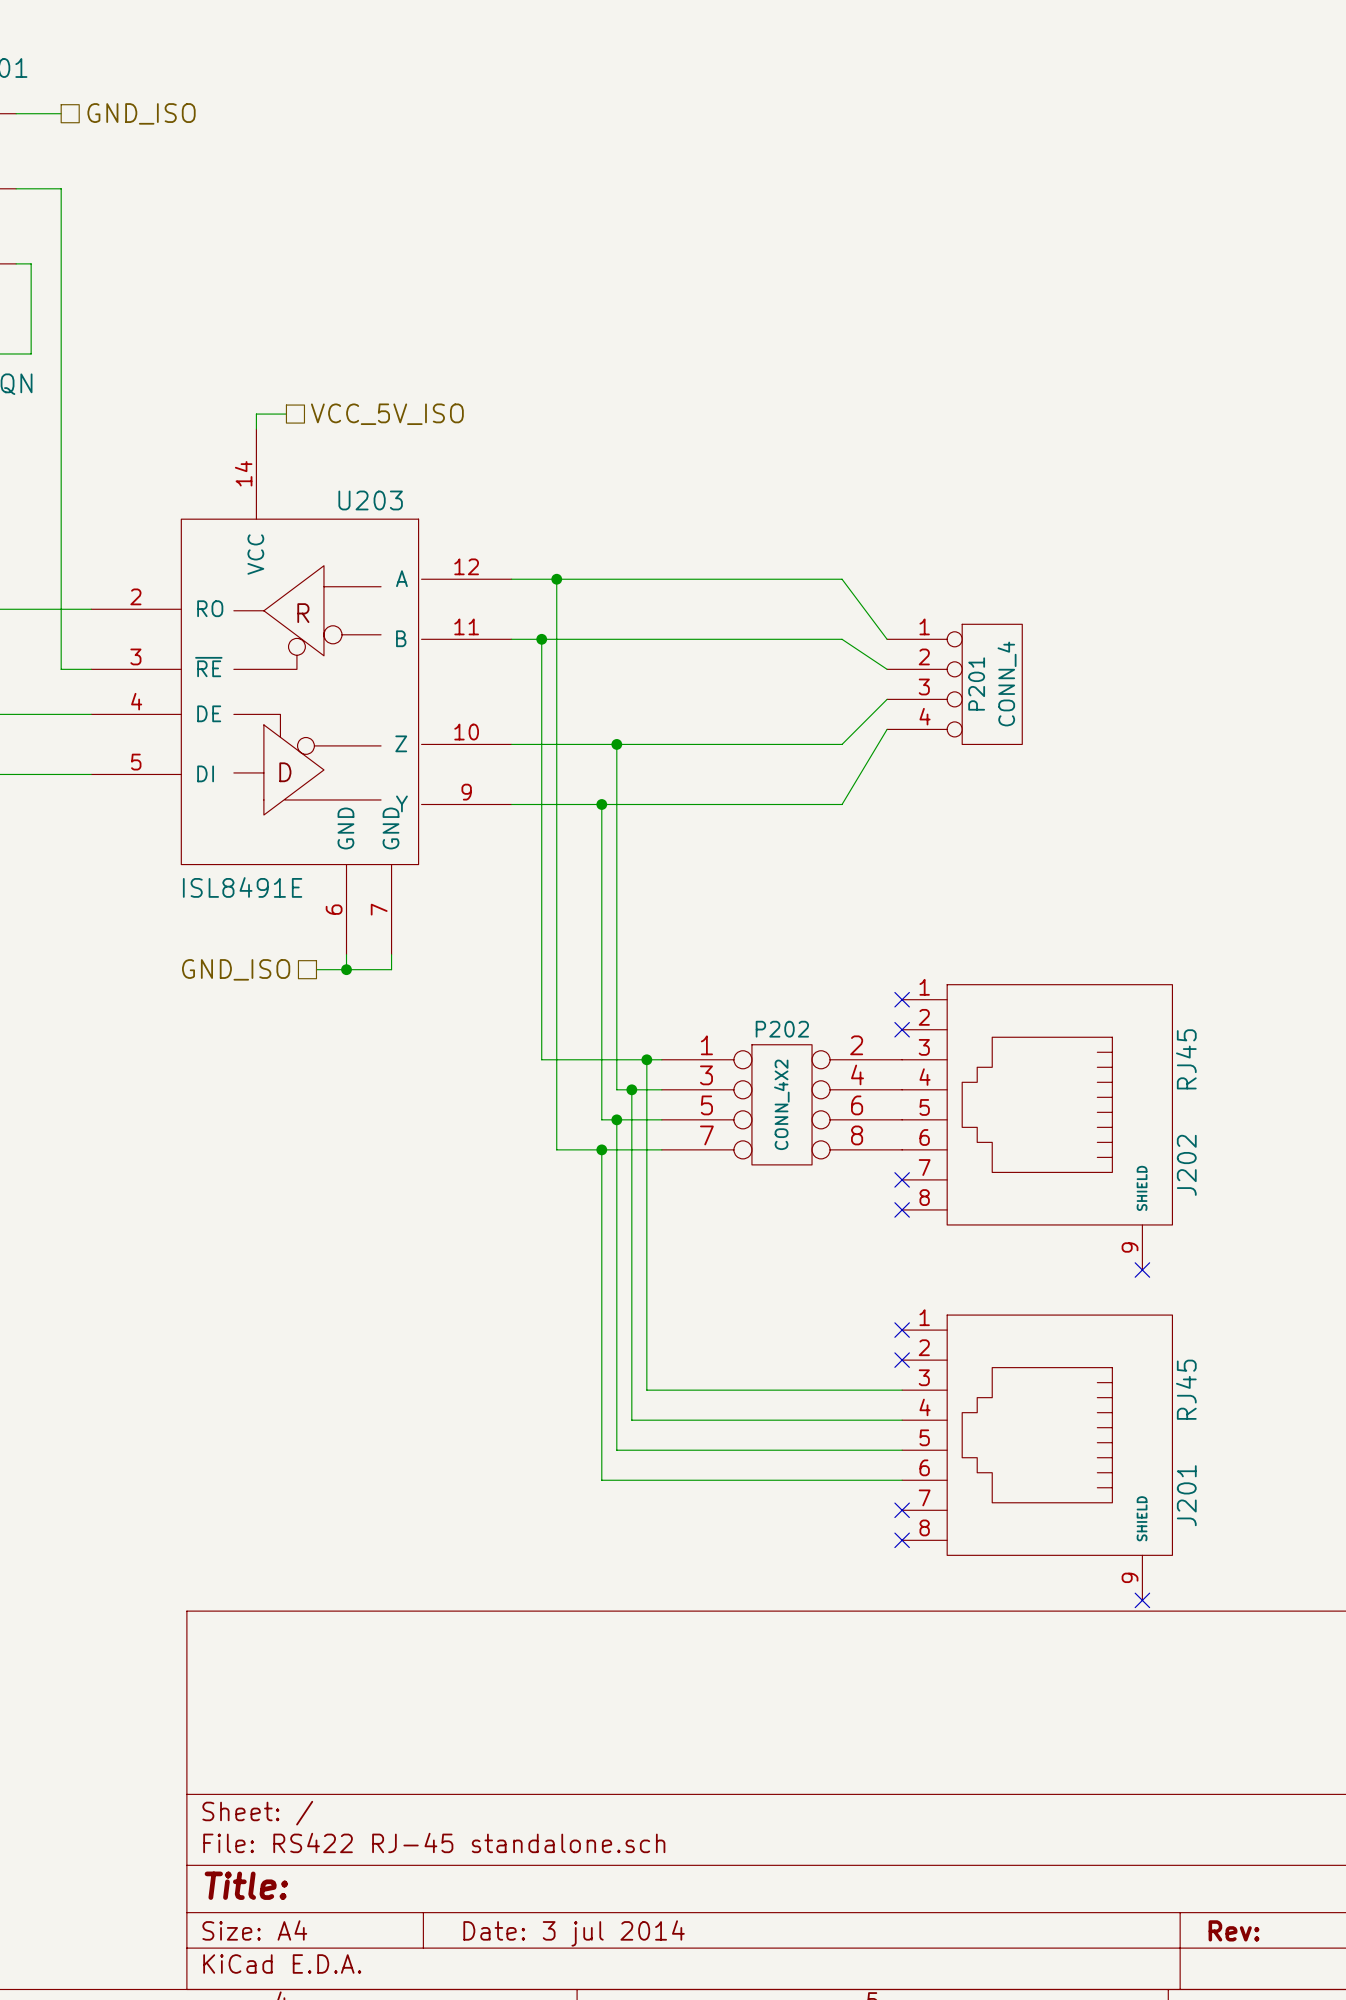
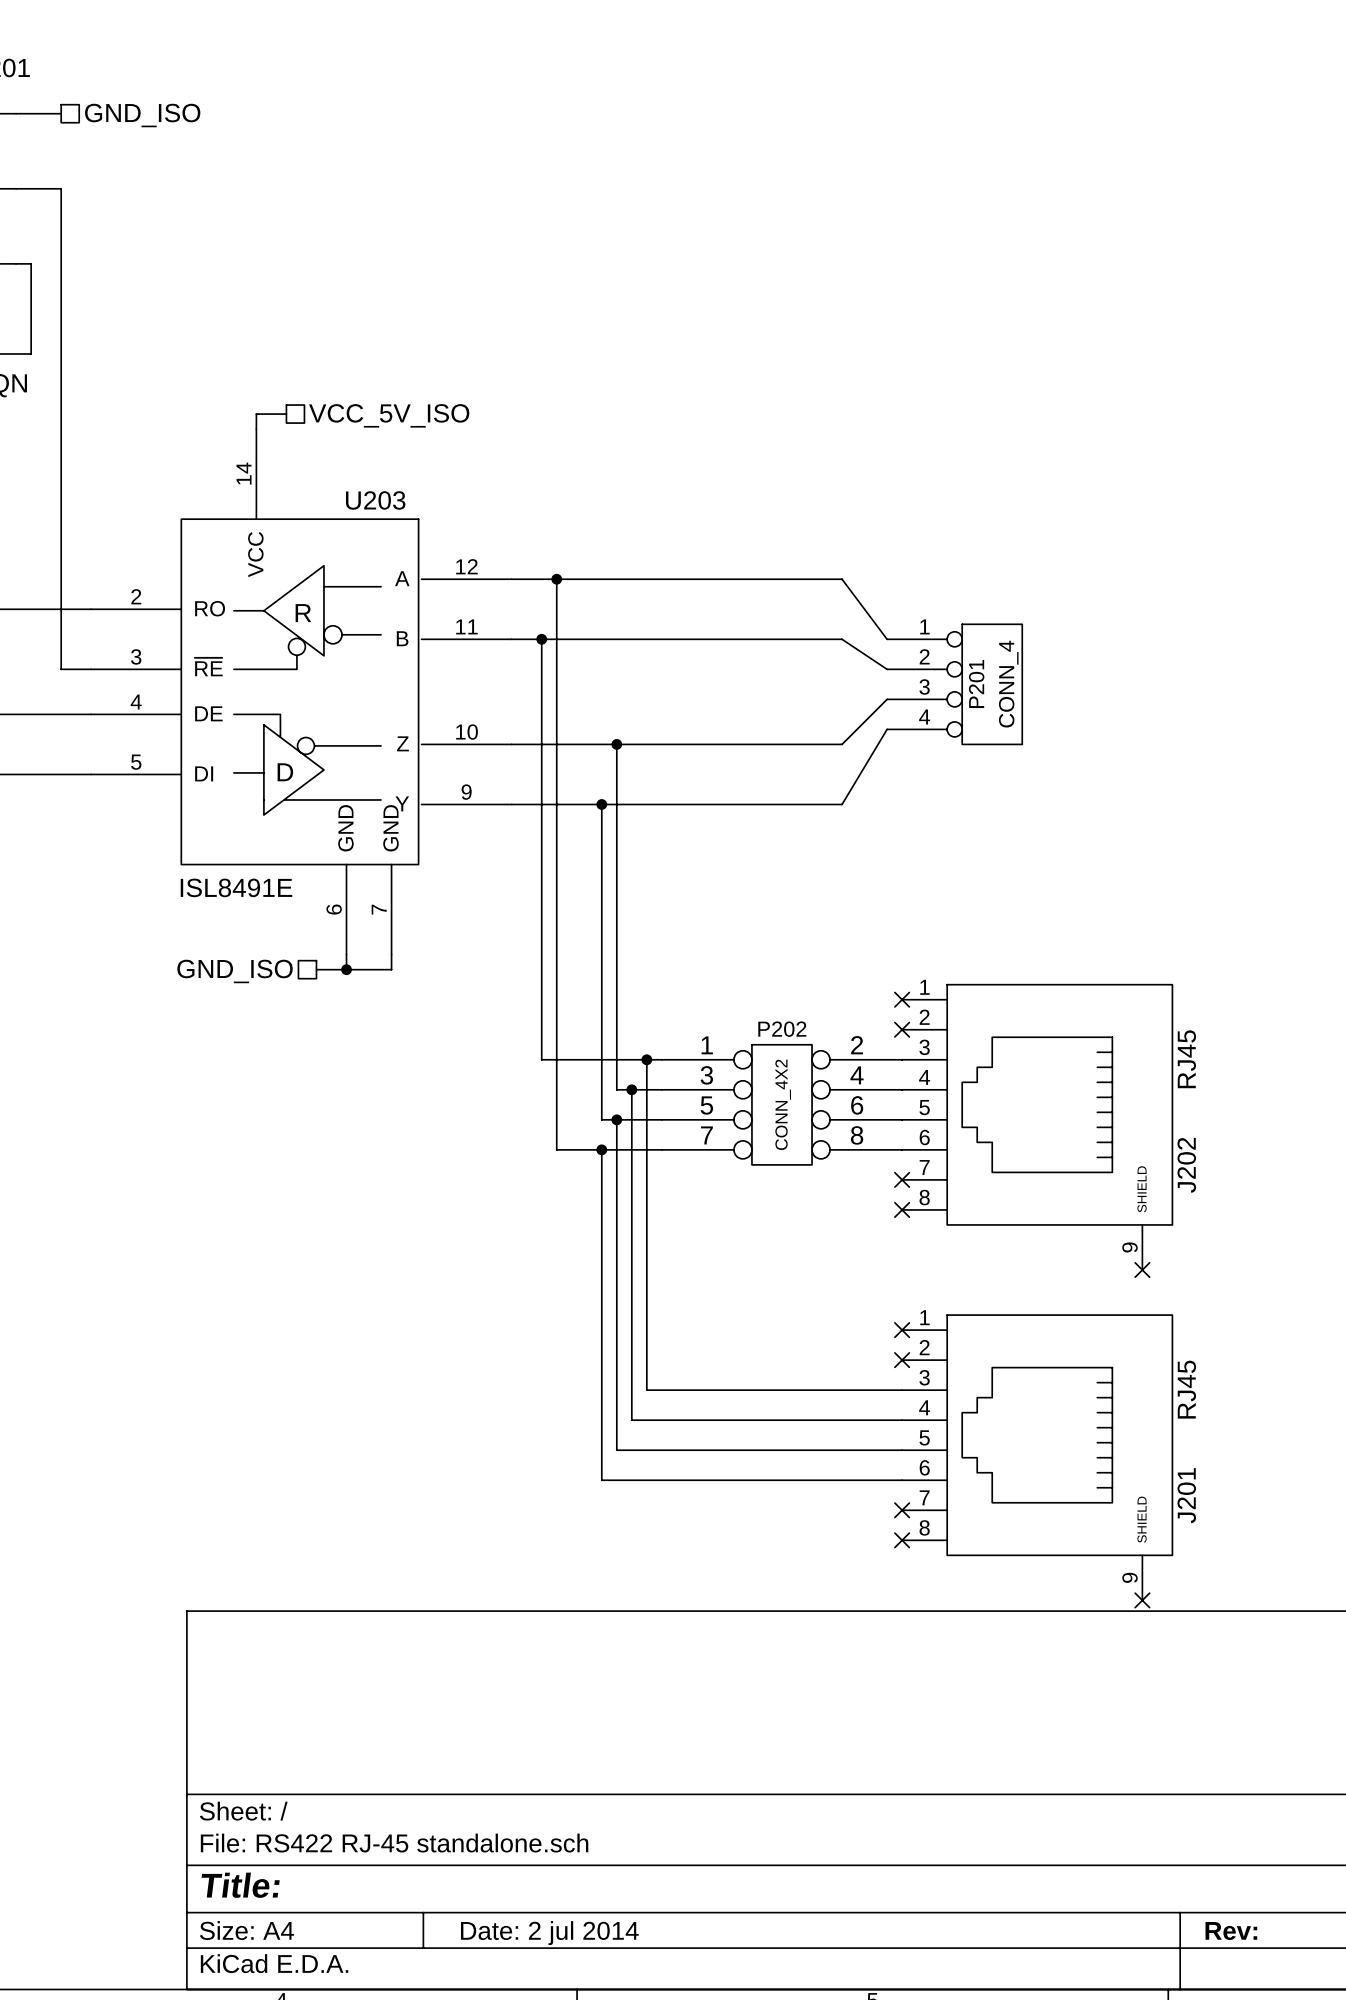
title block: Date: 3 jul 2014 (574, 1933) -> Date: 2 jul 2014 (549, 1933)

